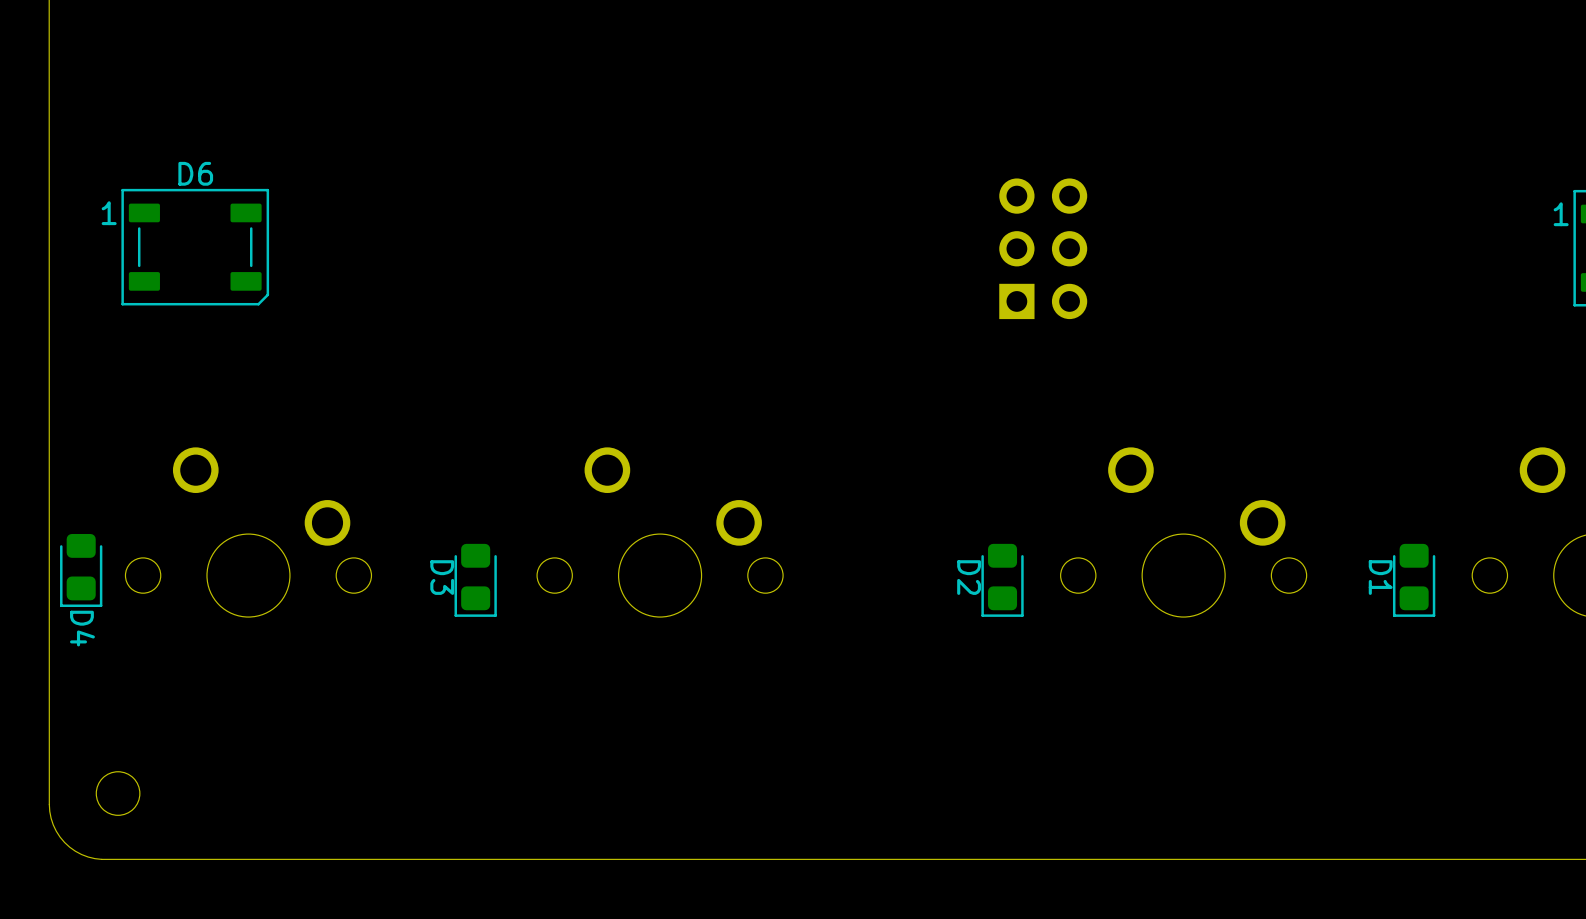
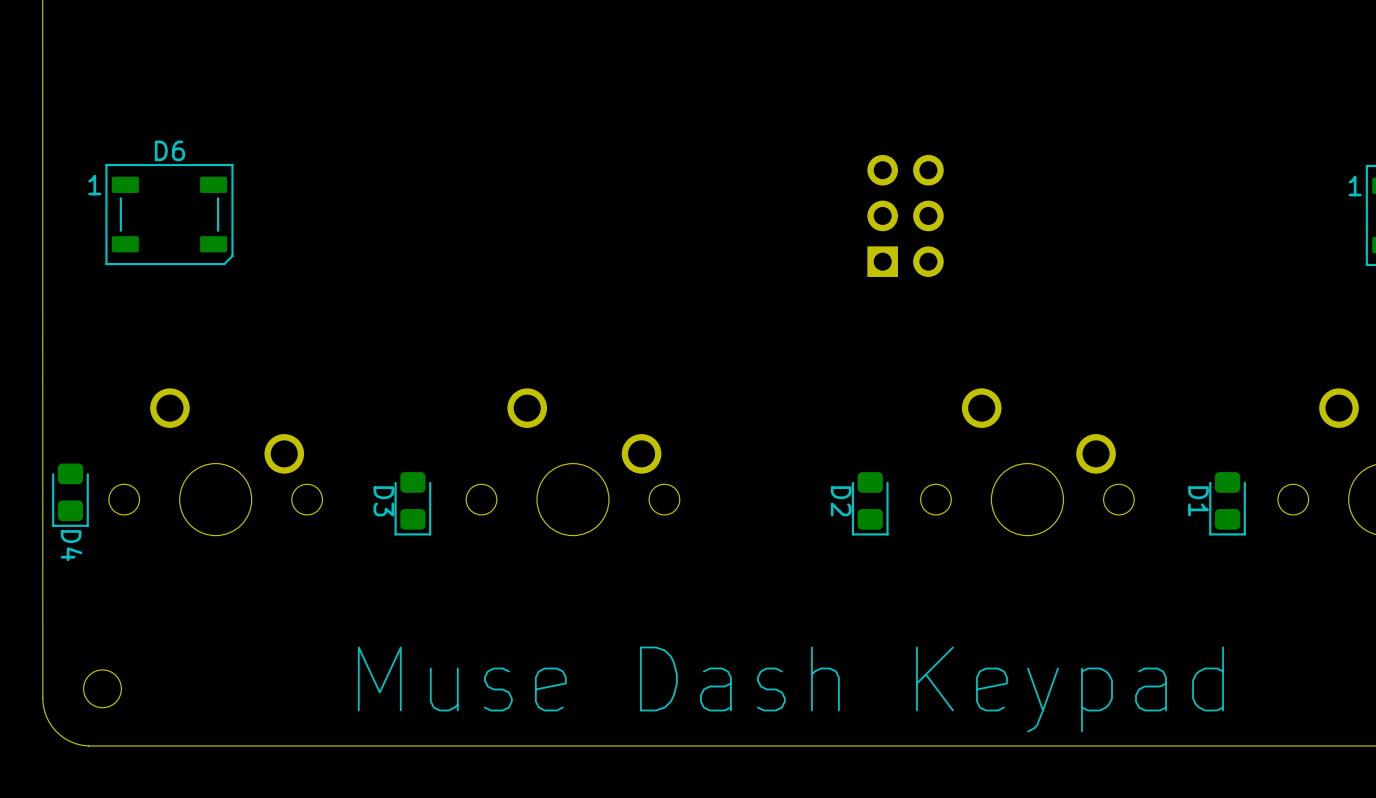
text: none -> Muse Dash Keypad (790, 689)

